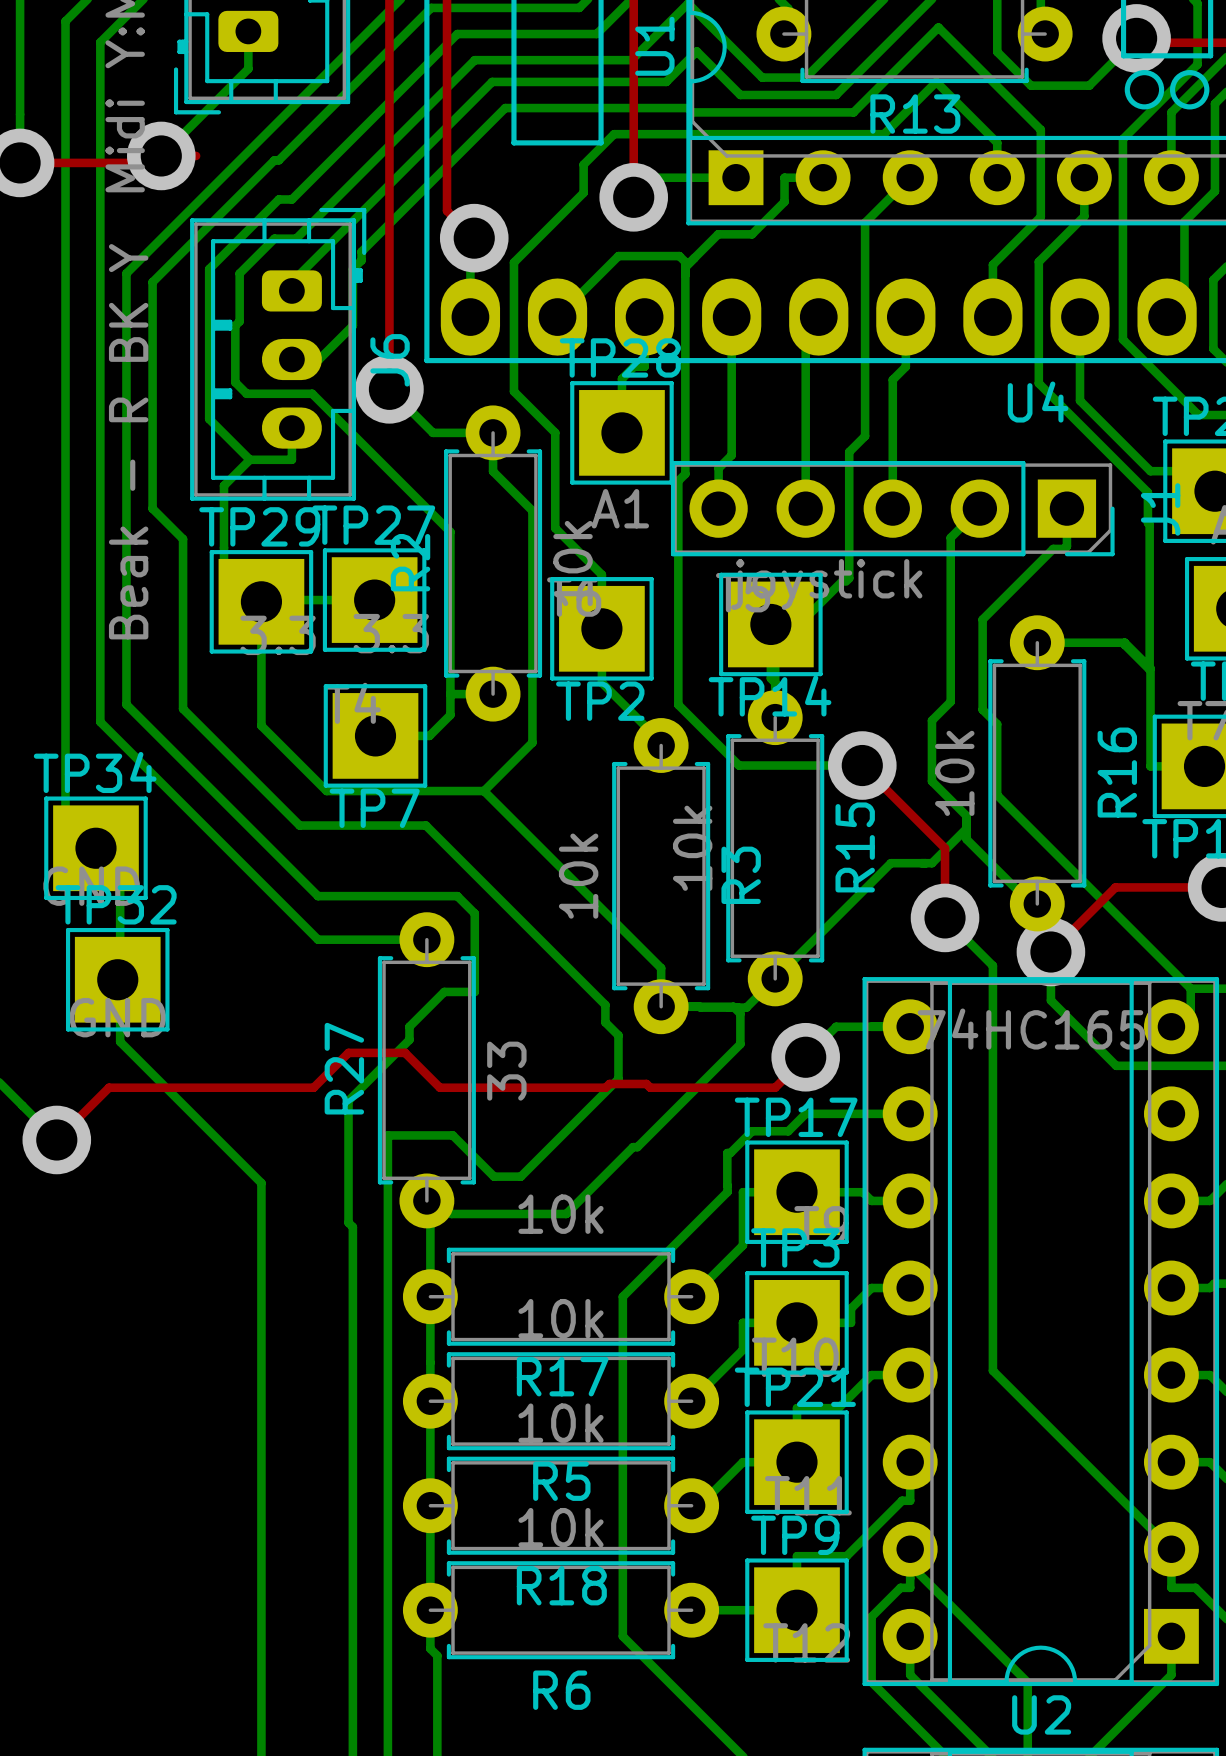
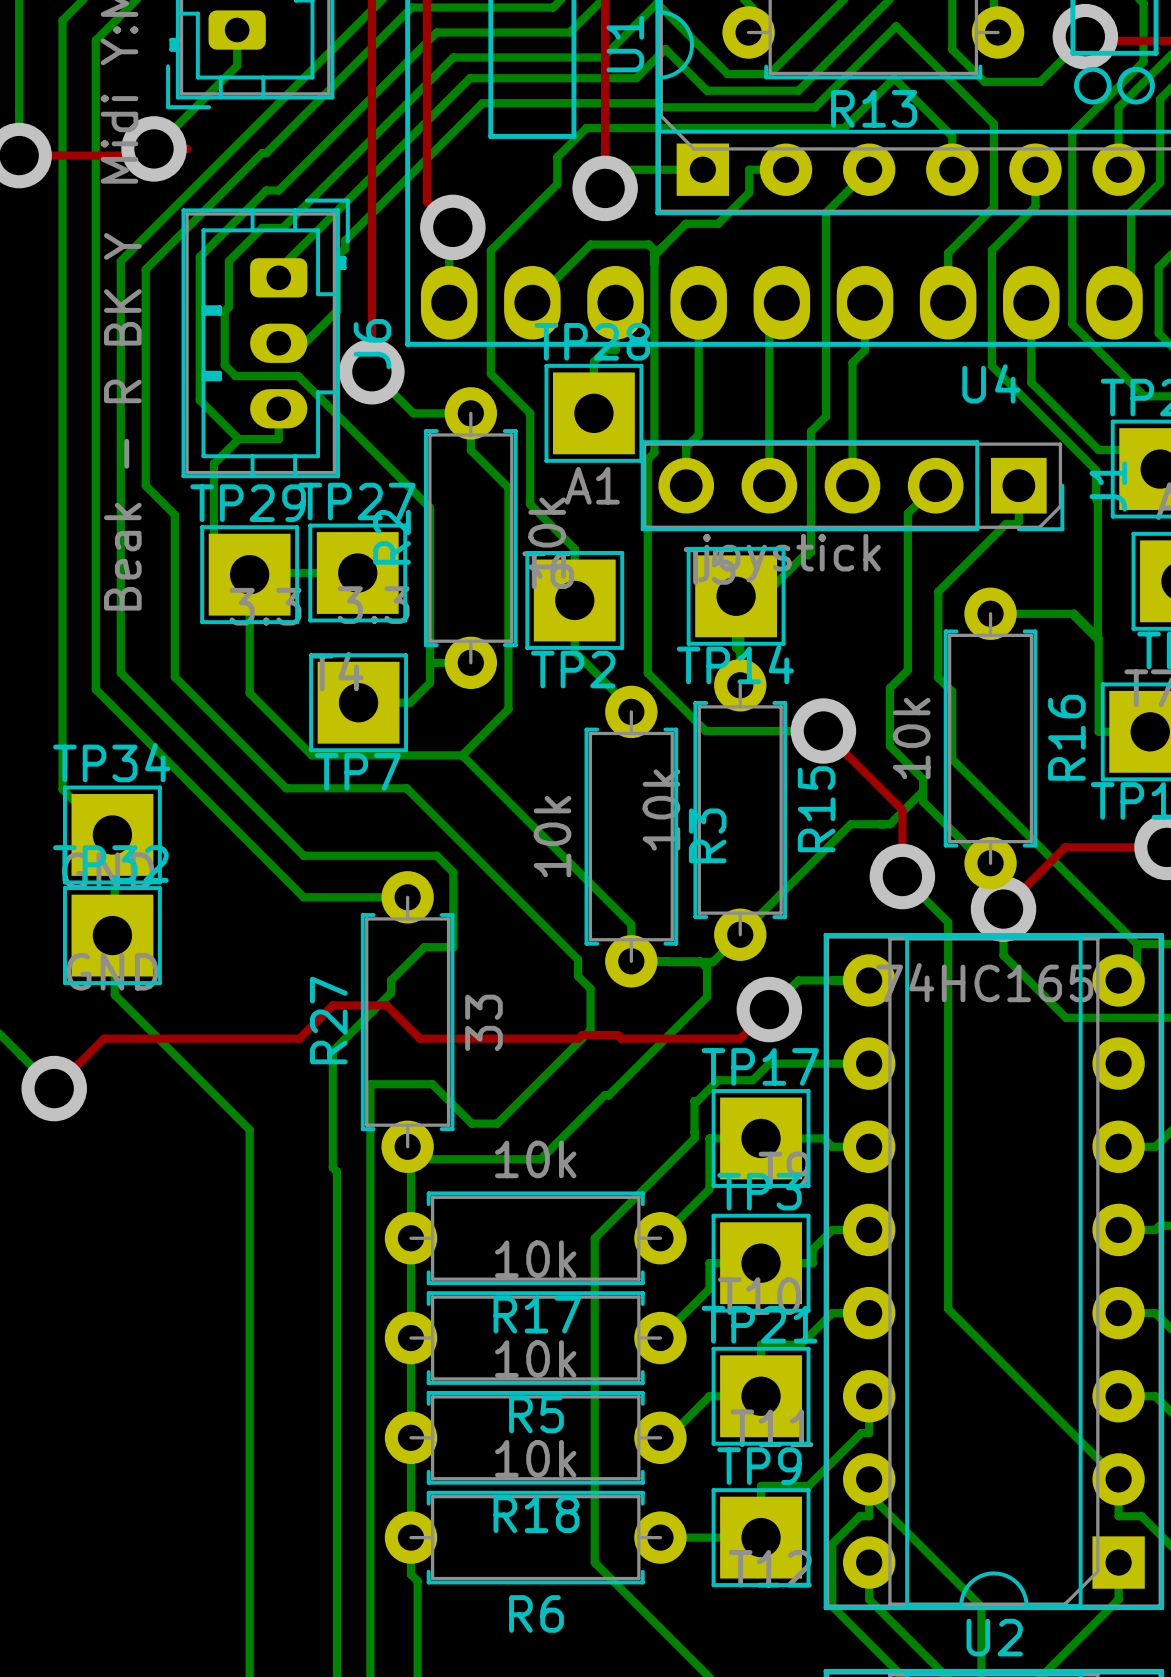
TP34 position: (95, 848) -> (112, 834)

